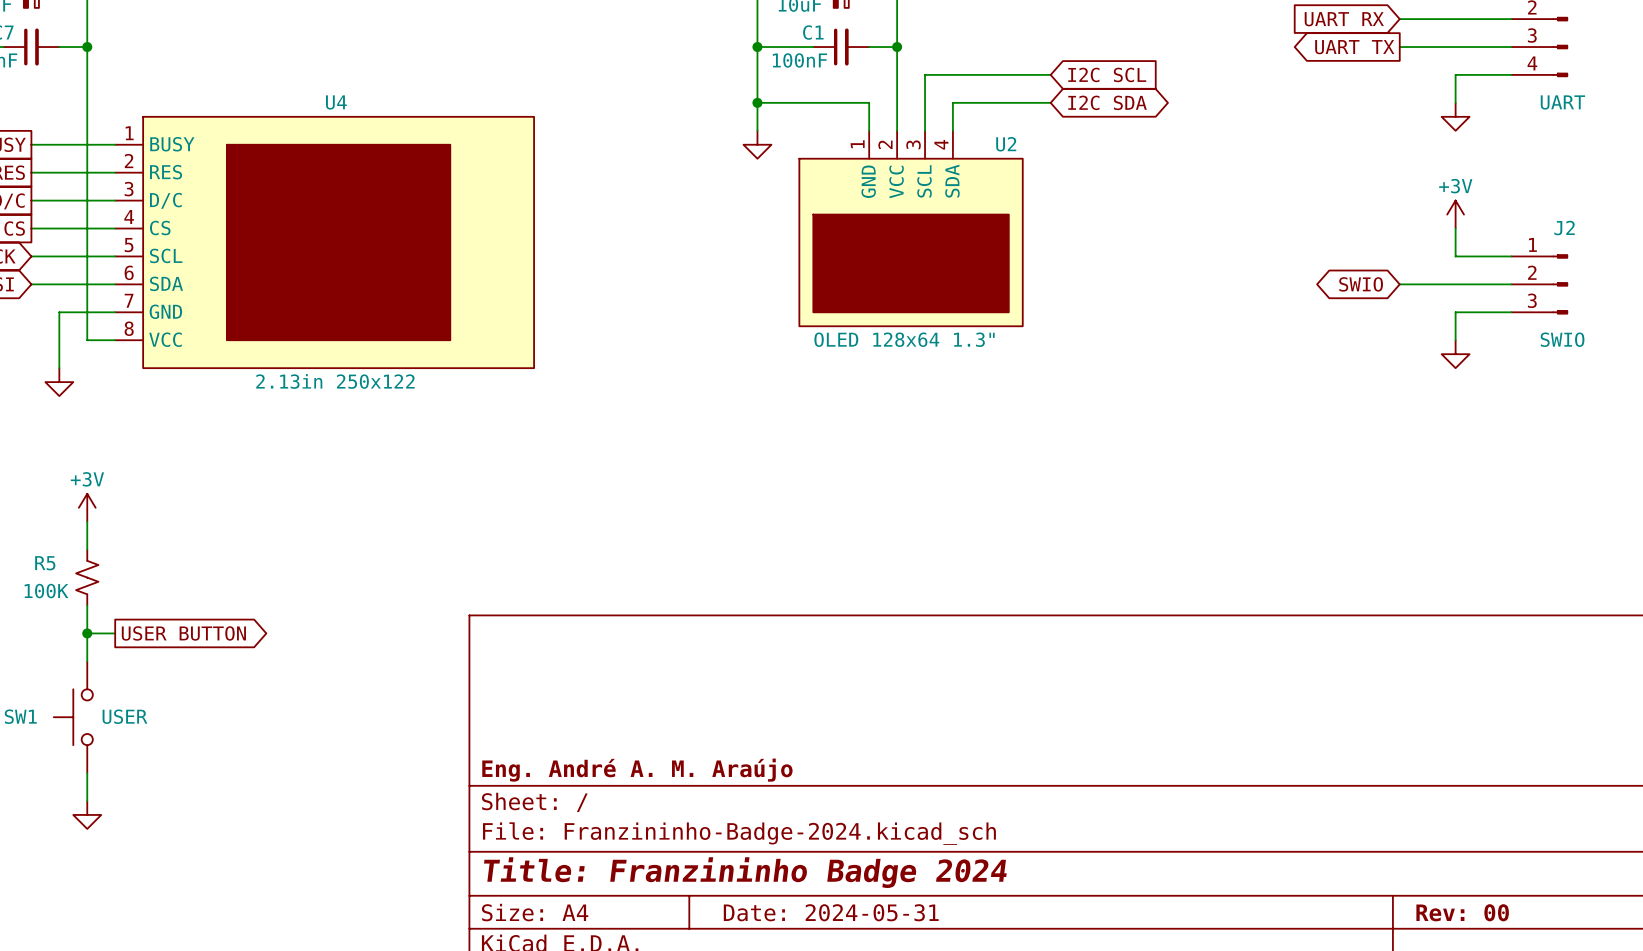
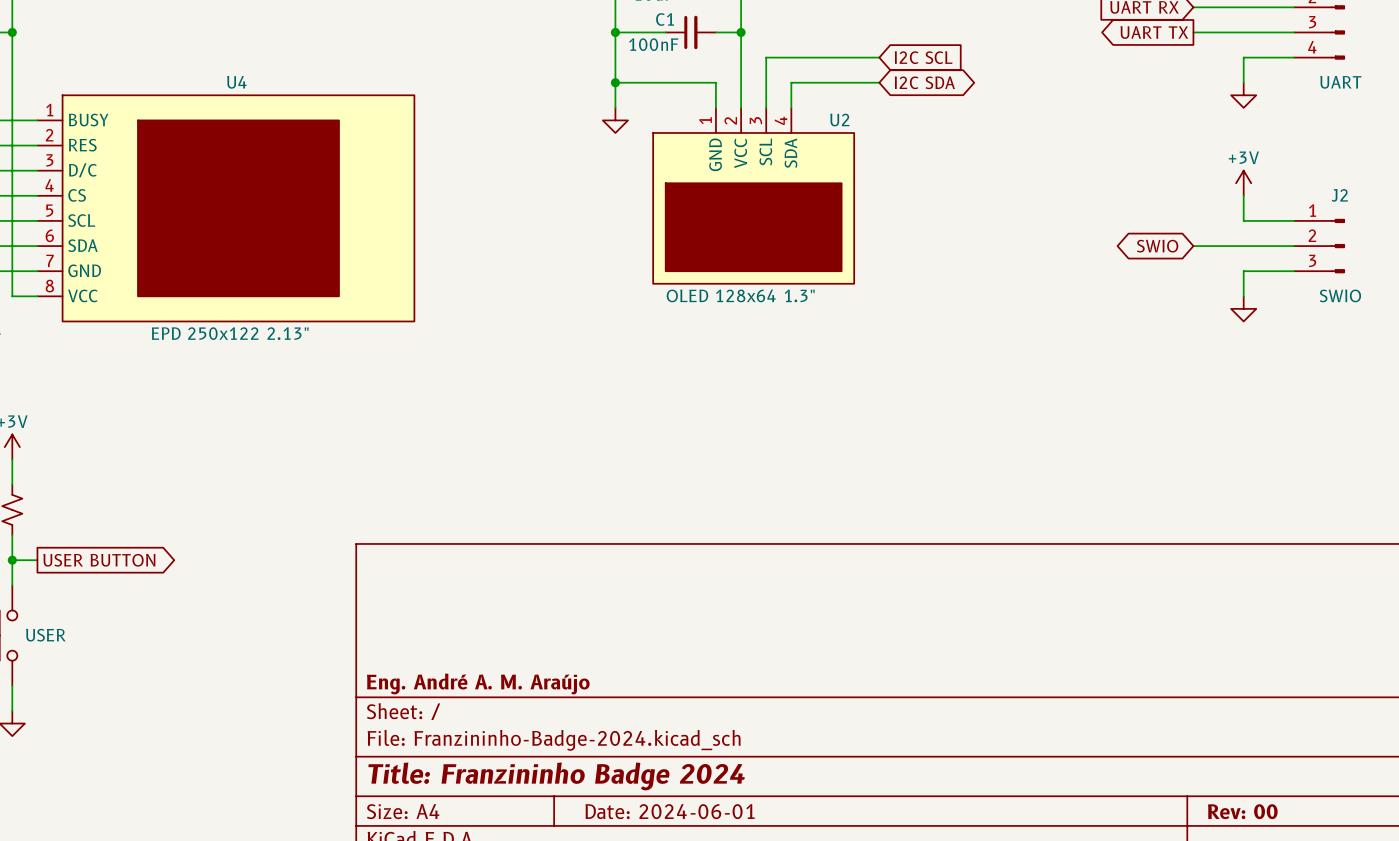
U4 value: 2.13in 250x122 (335, 381) -> EPD 250x122 2.13" (230, 333)
title block: Date: 2024-05-31 (831, 912) -> Date: 2024-06-01 (670, 811)

